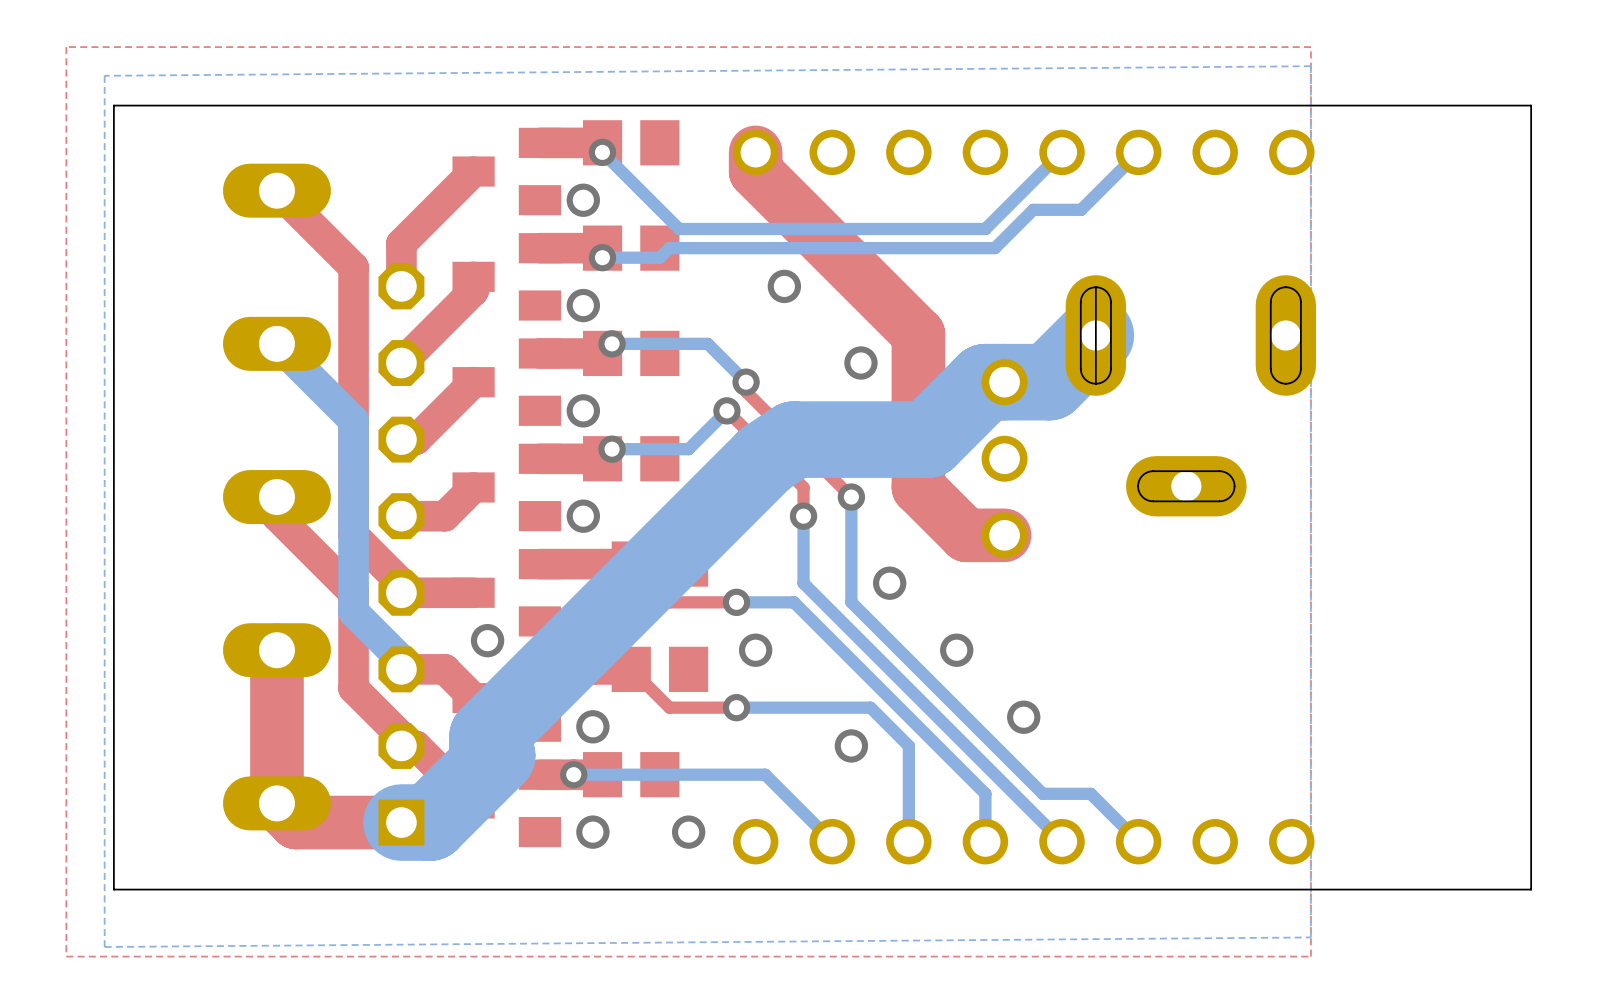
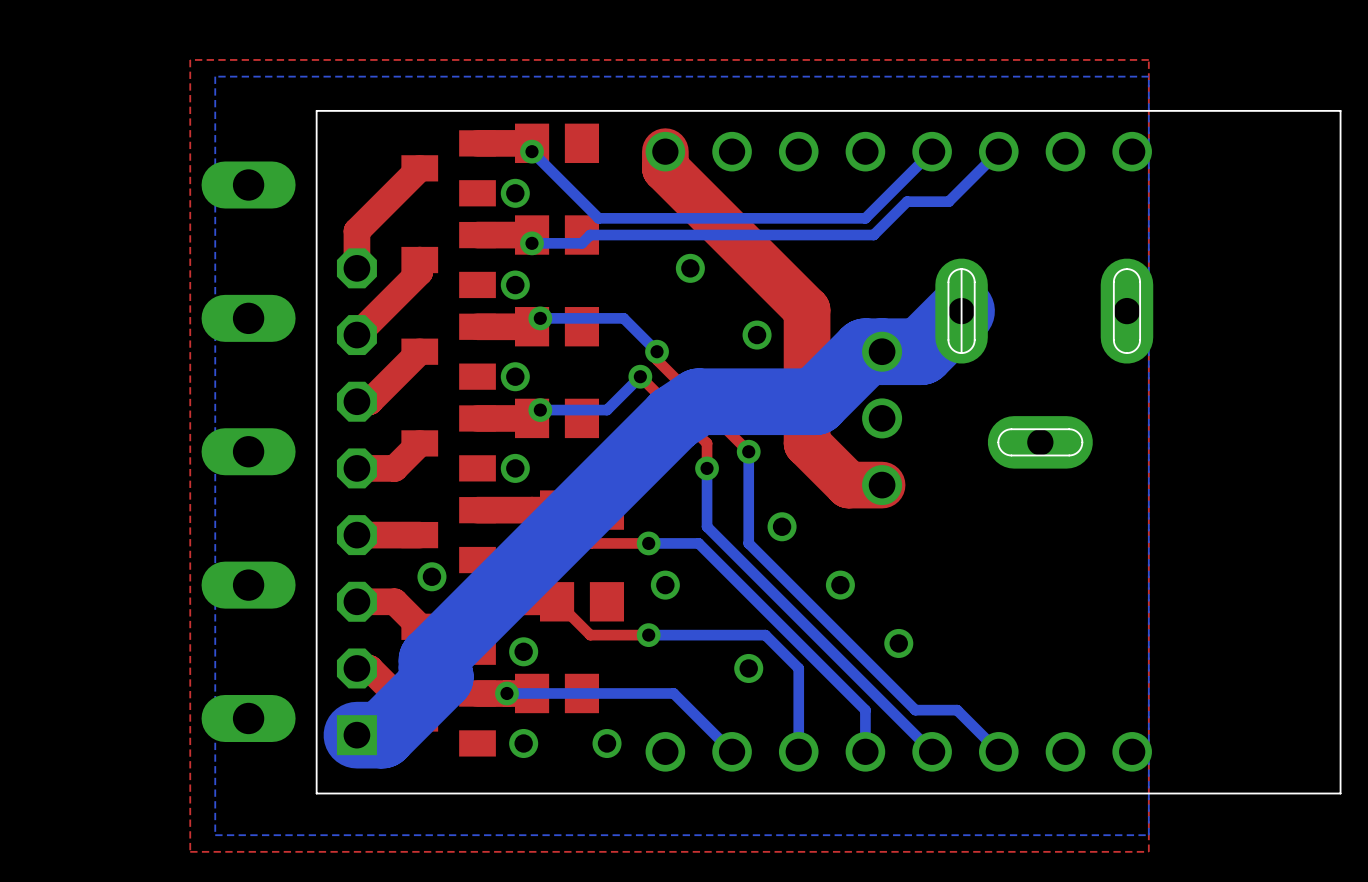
top zone outline: (209, 47) (66, 47) (66, 956) (209, 956) -> (190, 59) (190, 851)
bottom zone outline: (1310, 66) (104, 75) (104, 947) (1310, 937) -> (1148, 76) (215, 76) (215, 835) (1148, 835)
board edge: (355, 105) (113, 105) (113, 889) (355, 889) -> (316, 110) (316, 793)
top track: (276, 190) (353, 267) (353, 535) (401, 583) (401, 592) -> none
bottom track: (276, 343) (353, 420) (353, 611) (401, 659) (401, 669) -> none
top track: (276, 497) (276, 516) (353, 592) (353, 688) (401, 736) (401, 745) -> none
top track: (276, 650) (276, 803) (296, 822) (401, 822) -> none

